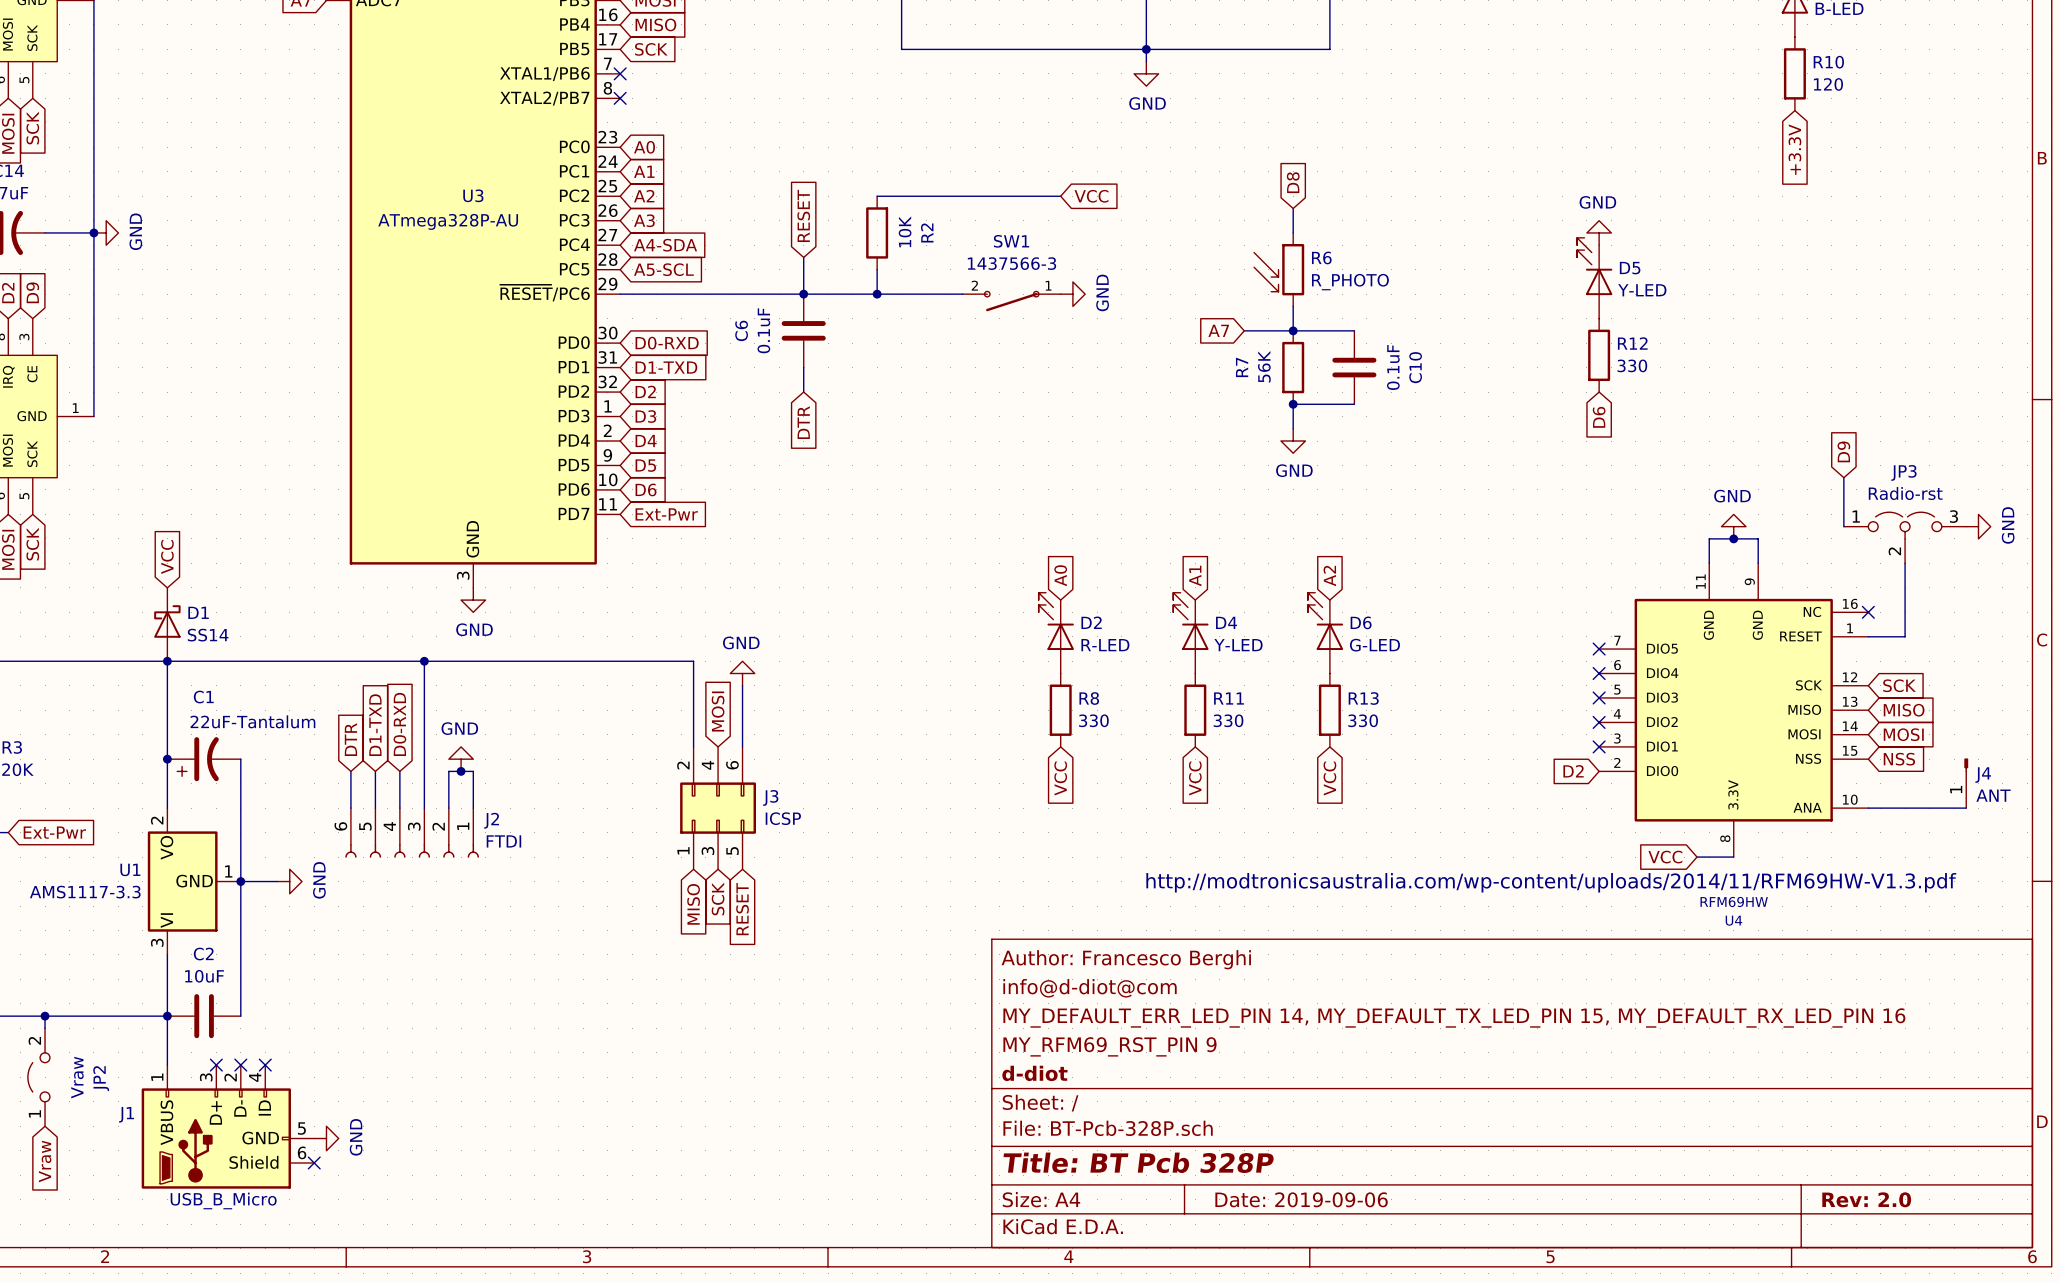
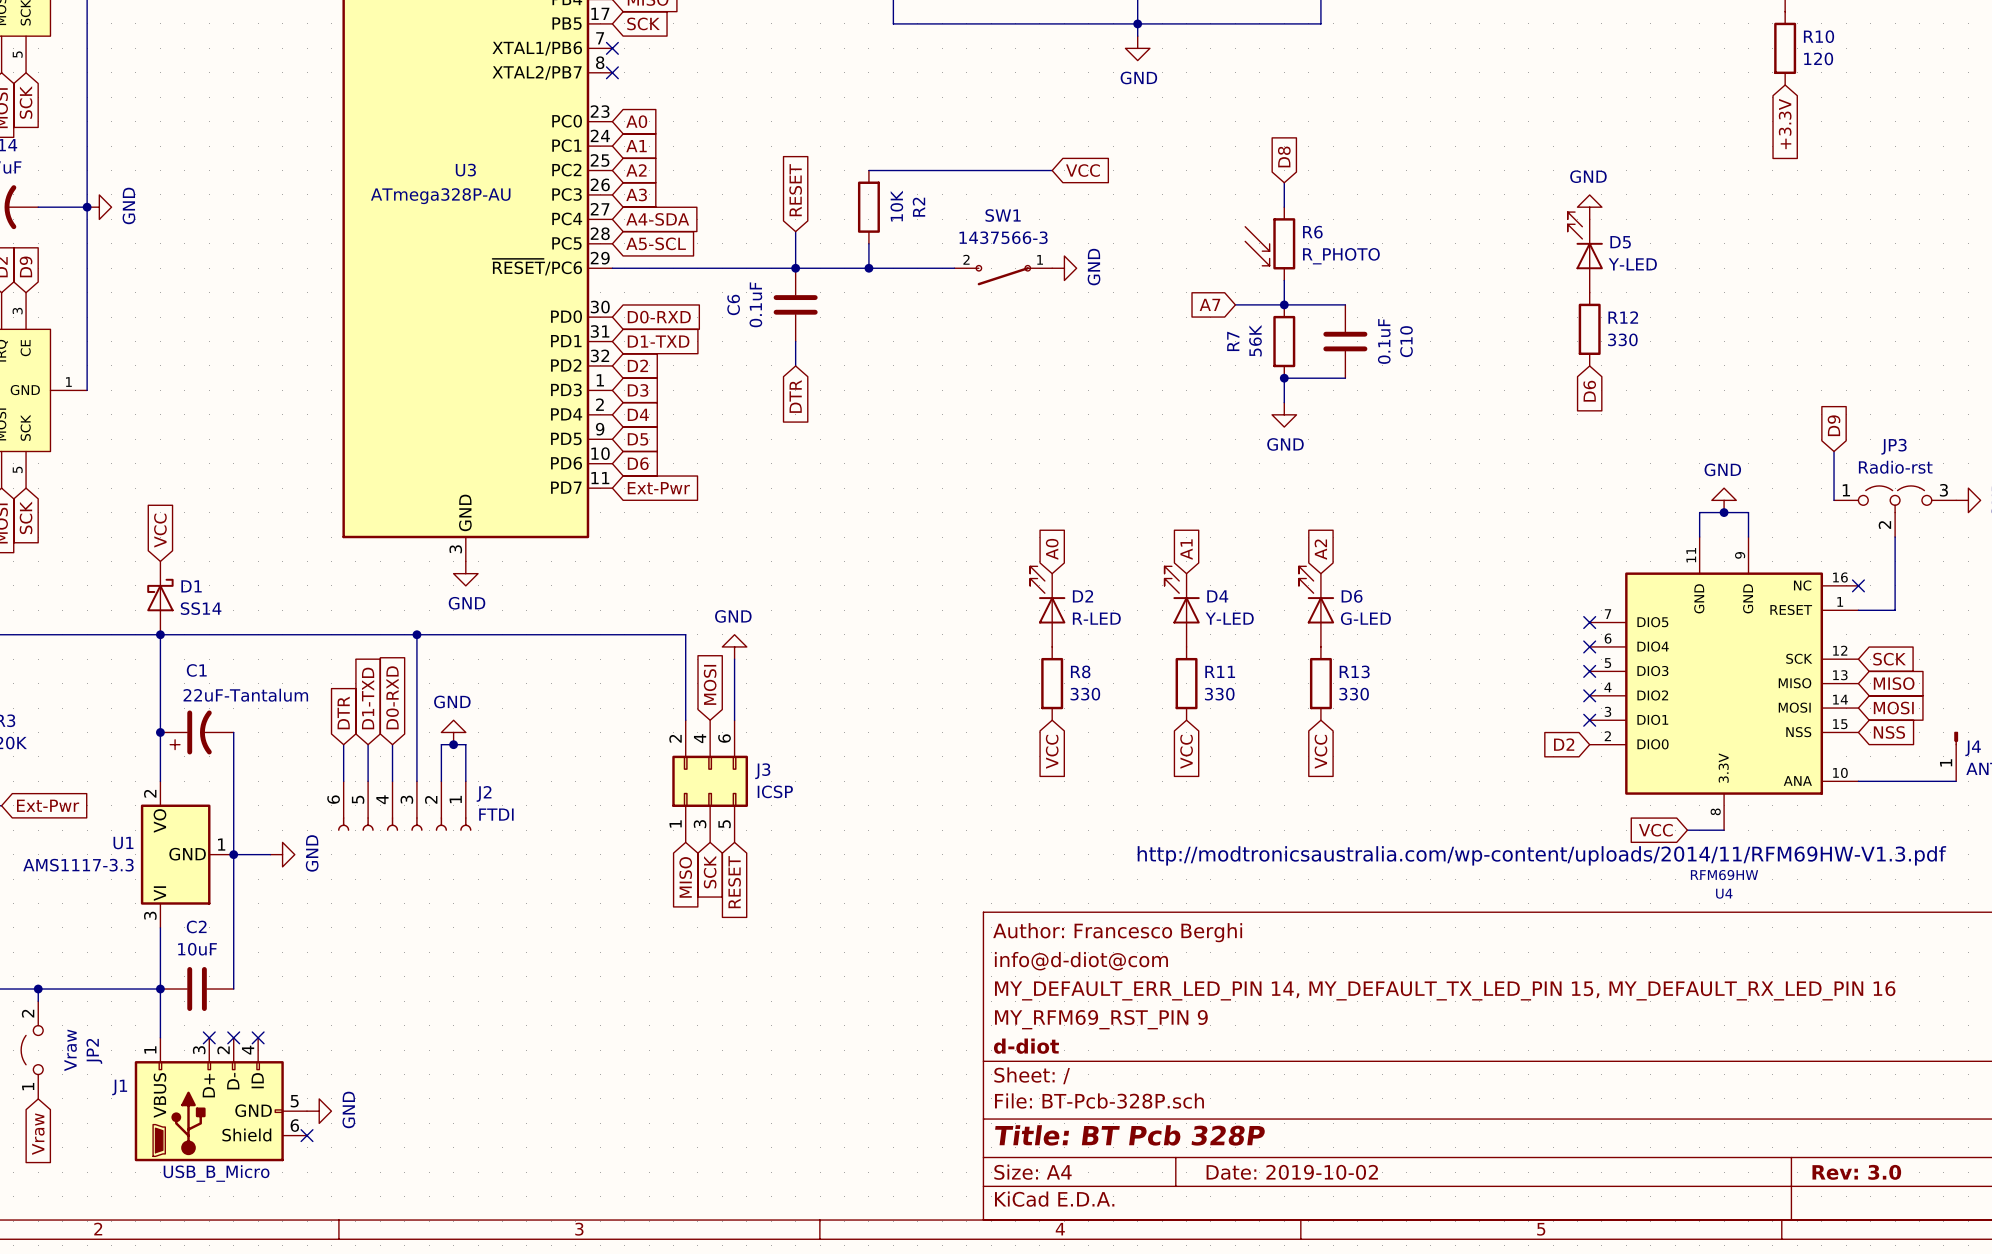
title block: Date: 2019-09-06 (1301, 1199) -> Date: 2019-10-02 (1292, 1172)
title block: Rev: 2.0 (1866, 1199) -> Rev: 3.0 (1856, 1172)

